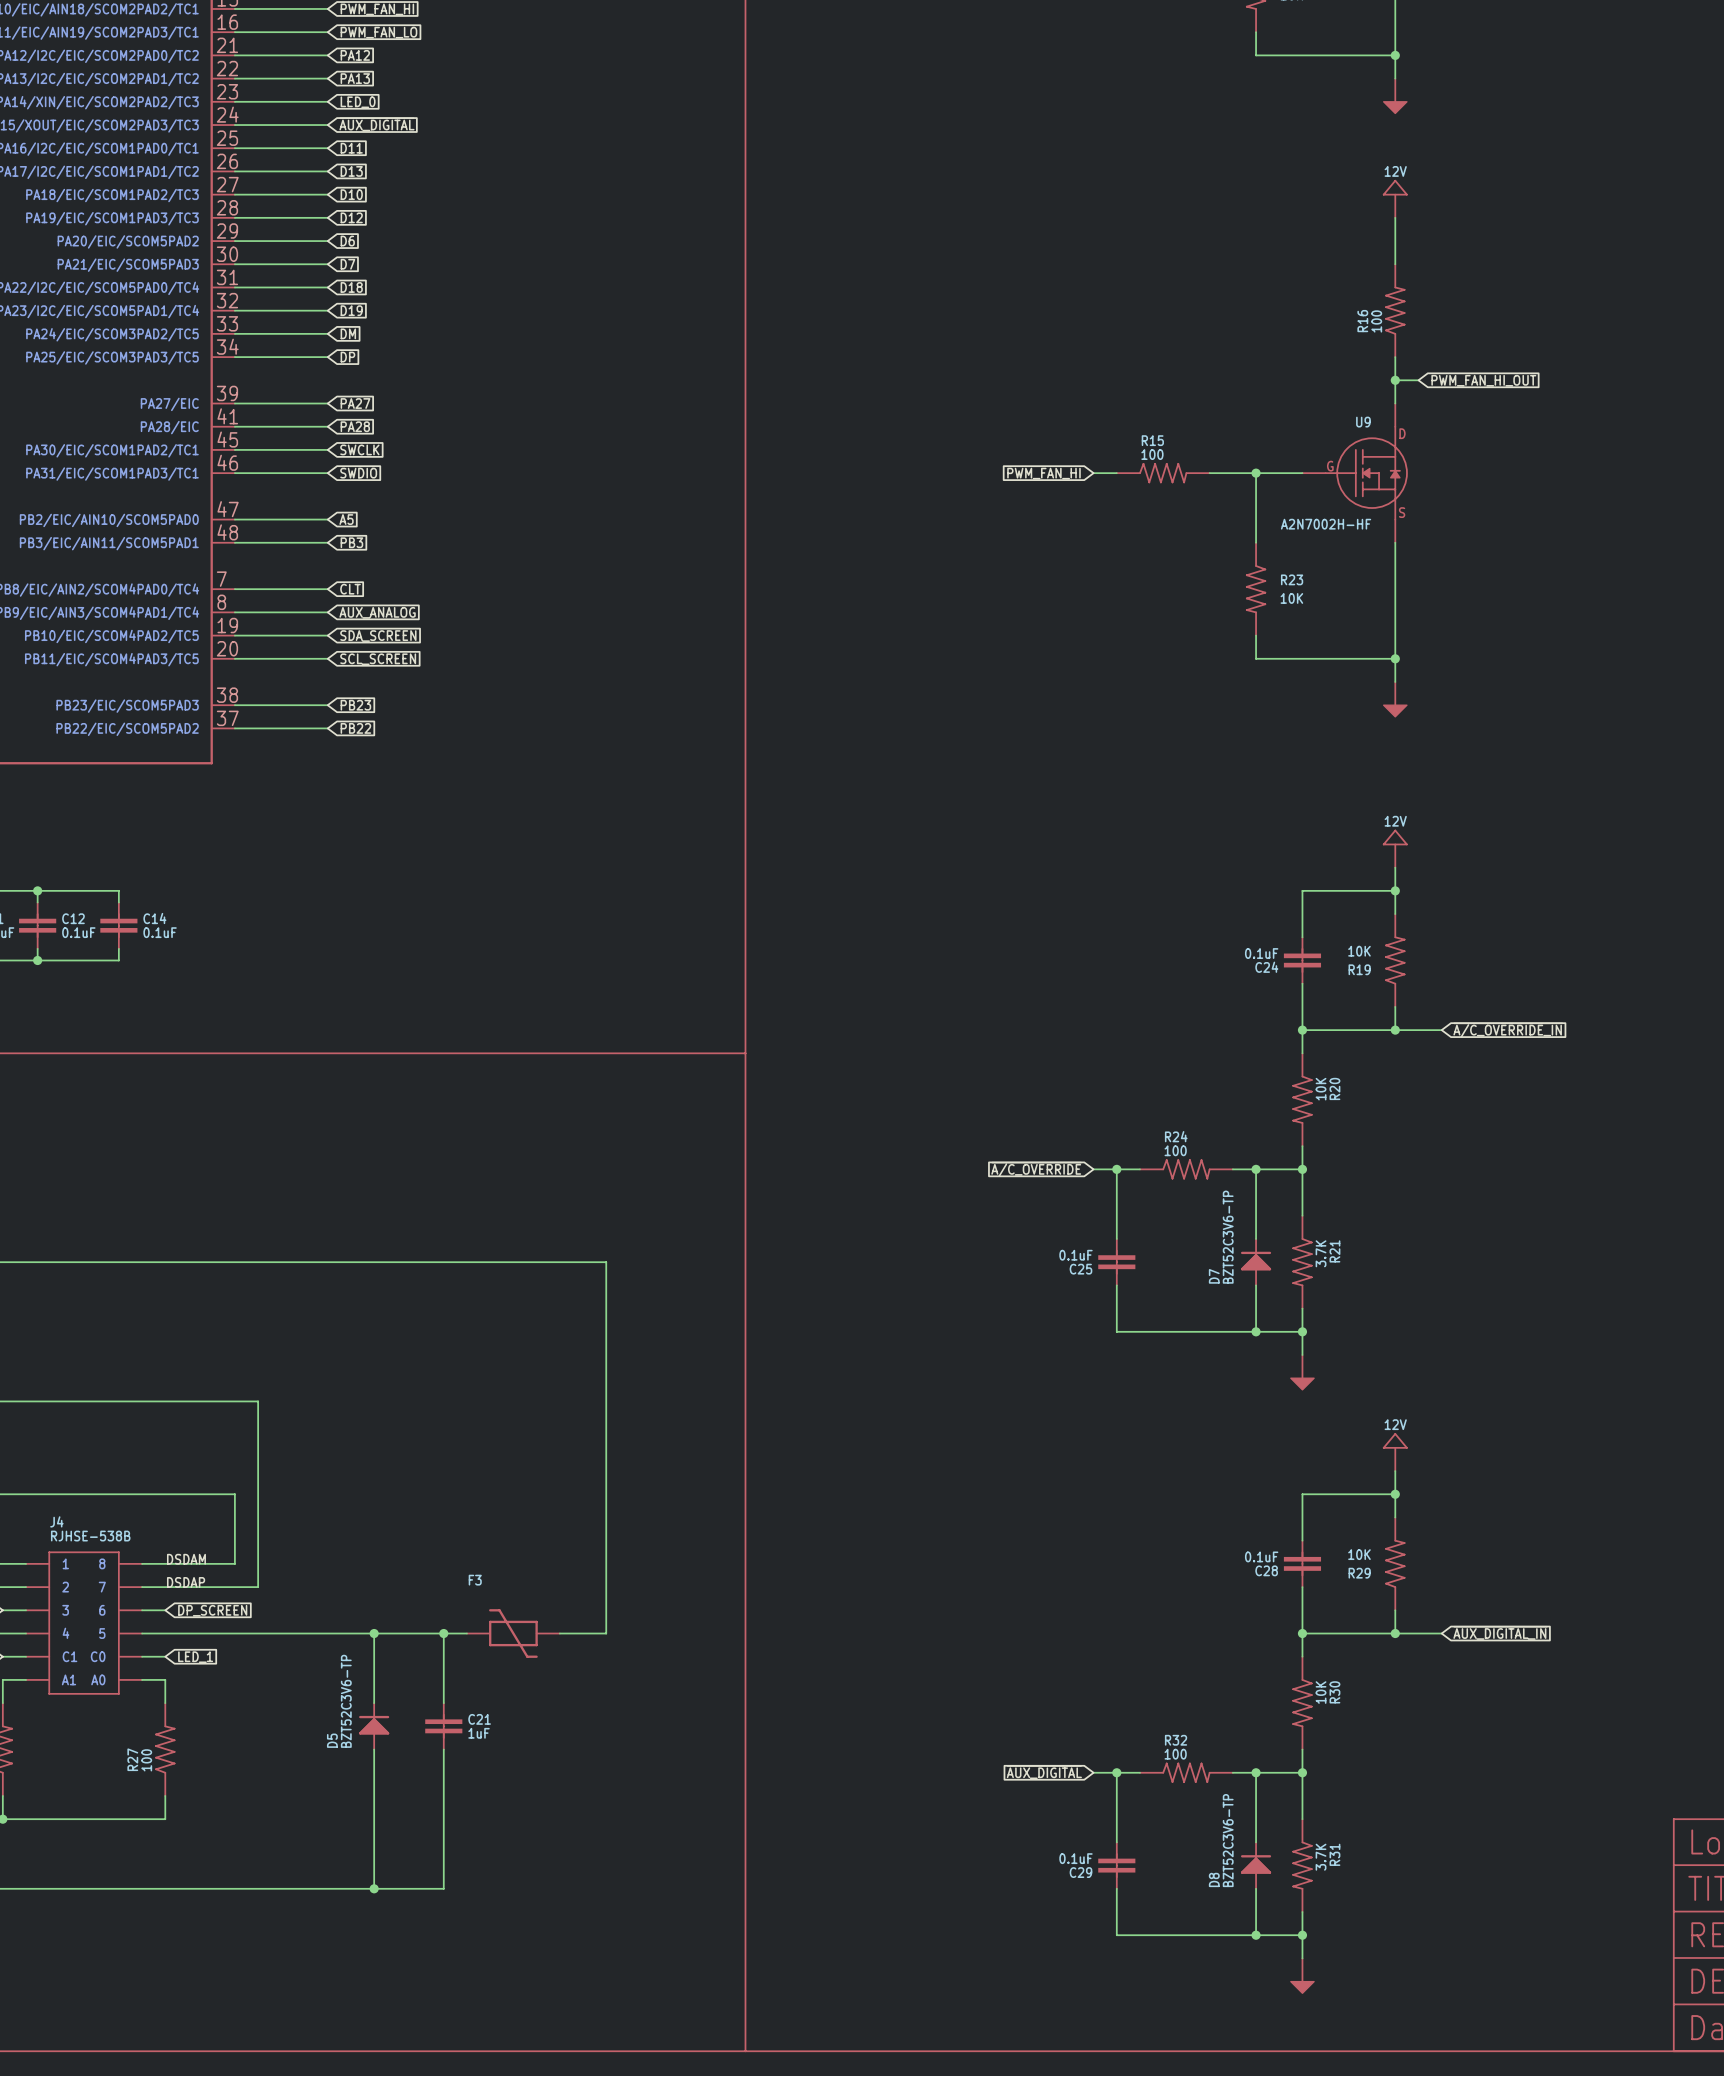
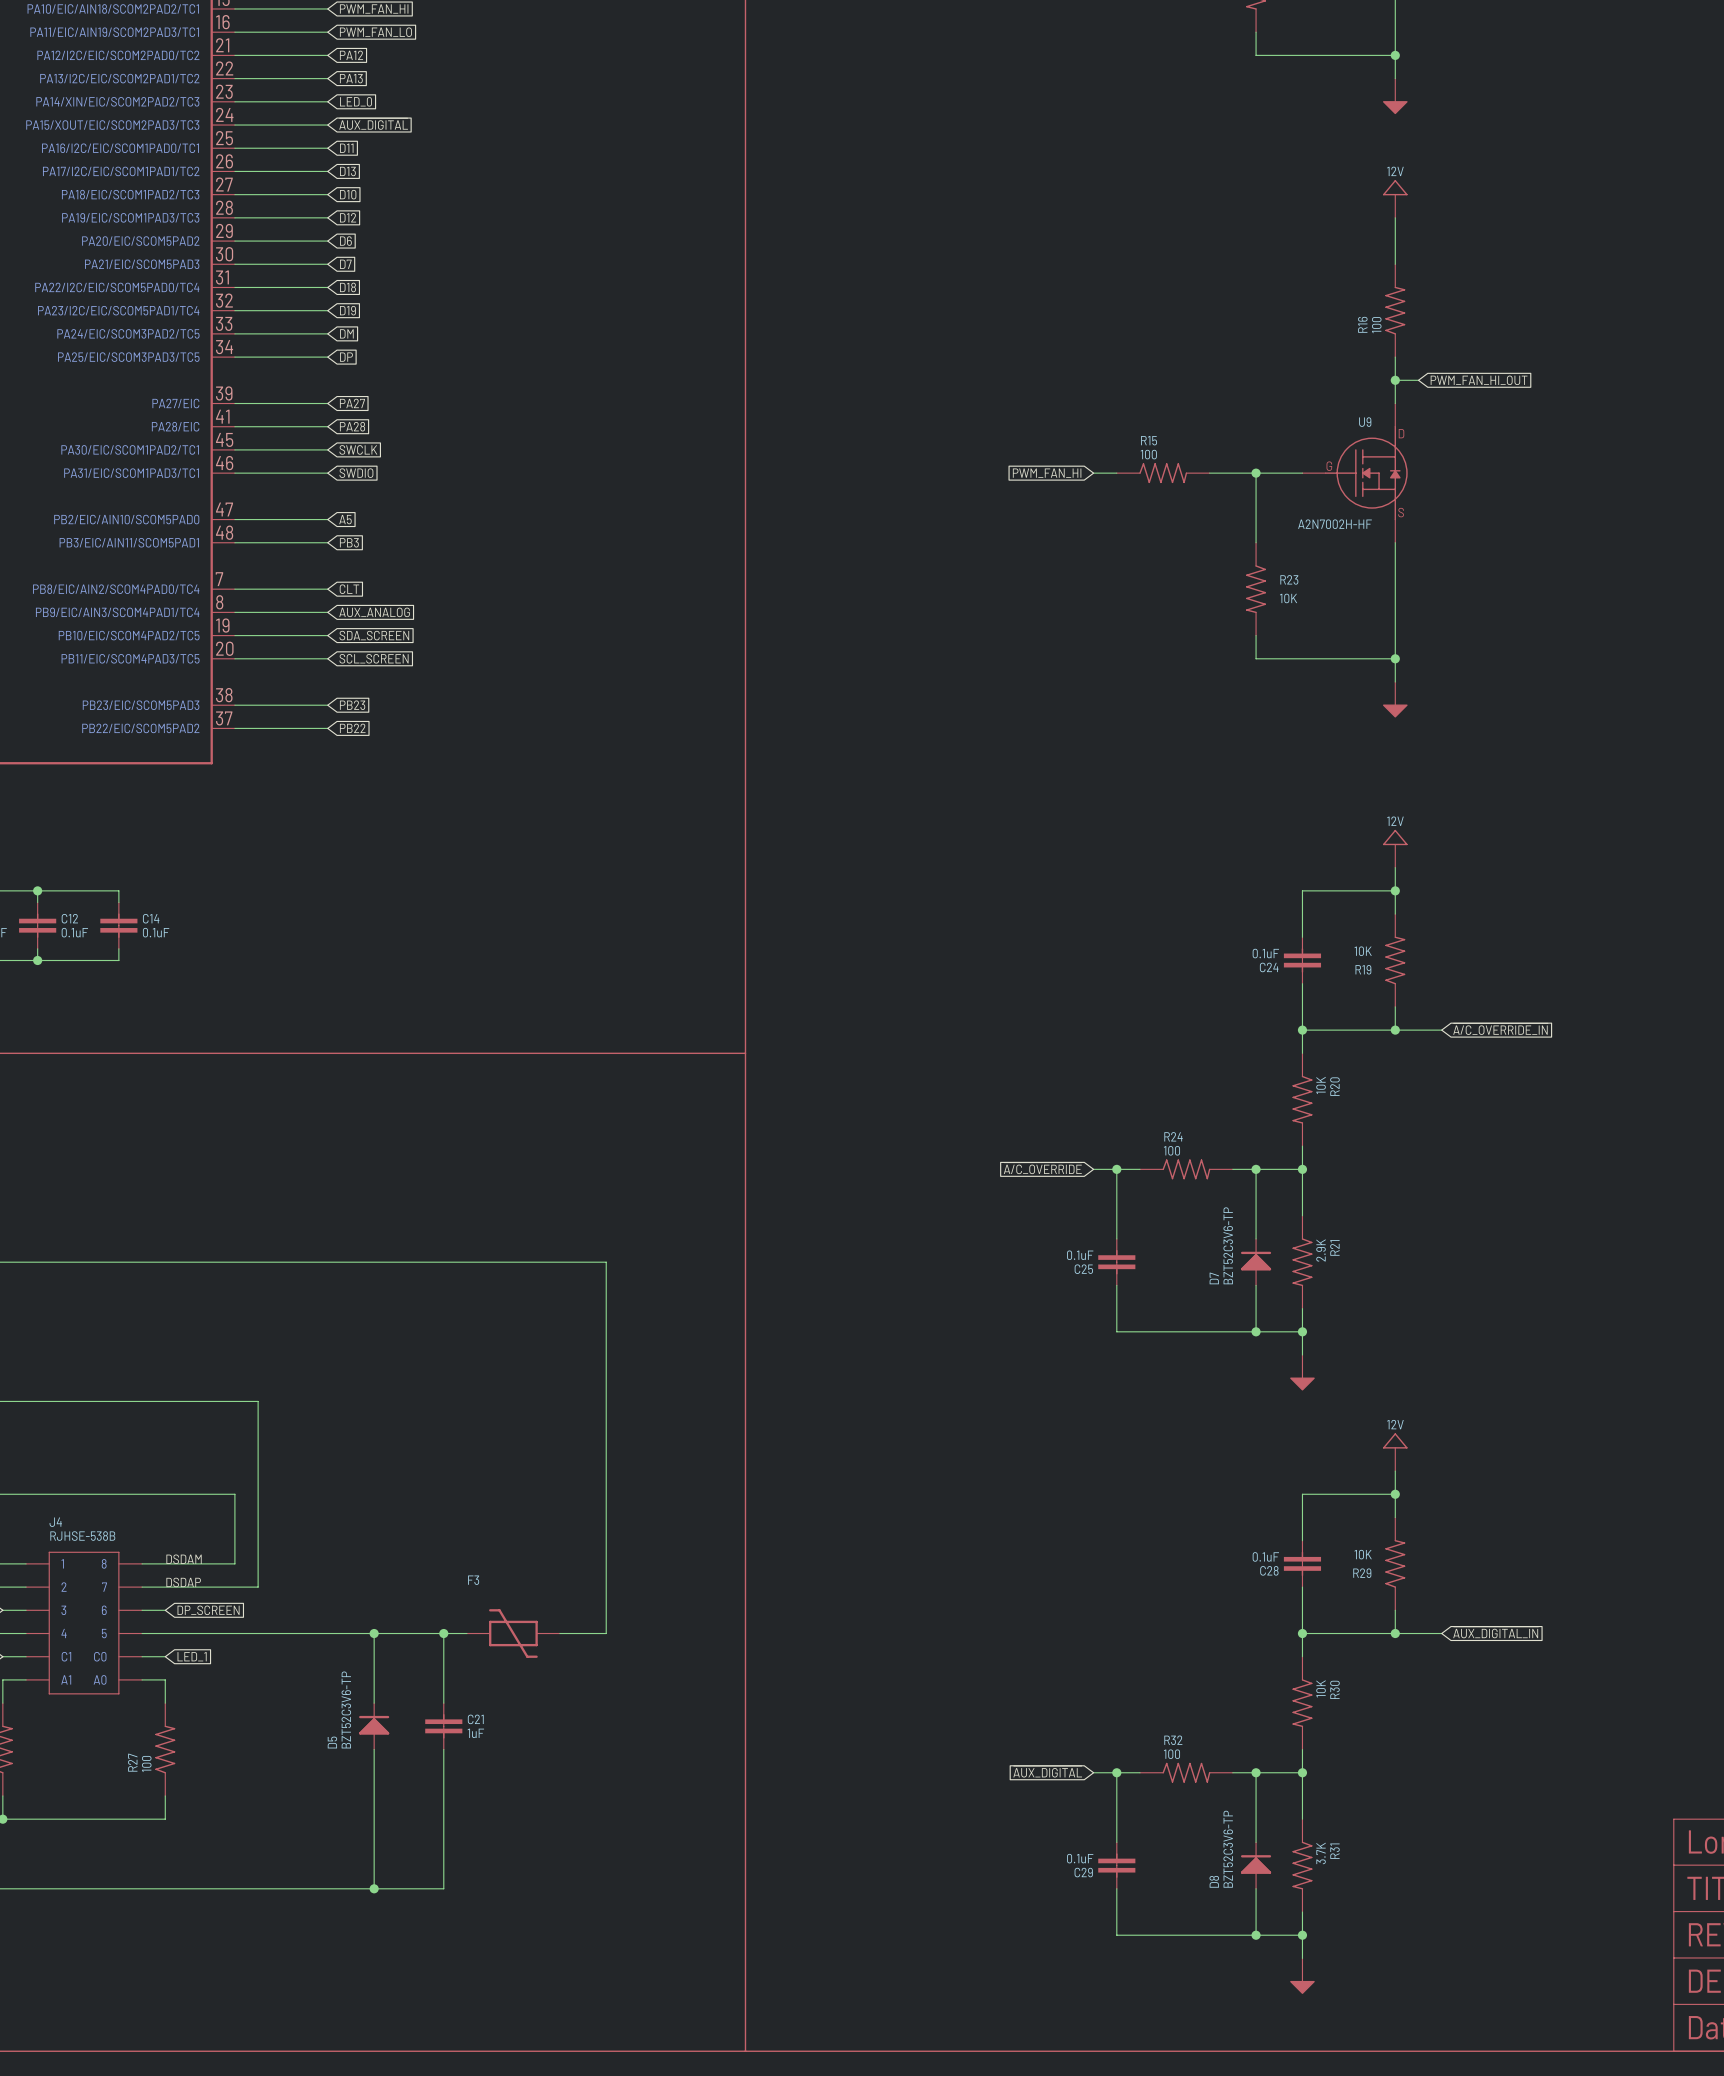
R21 value: 3.7K (1321, 1253) -> 2.9K (1321, 1250)

